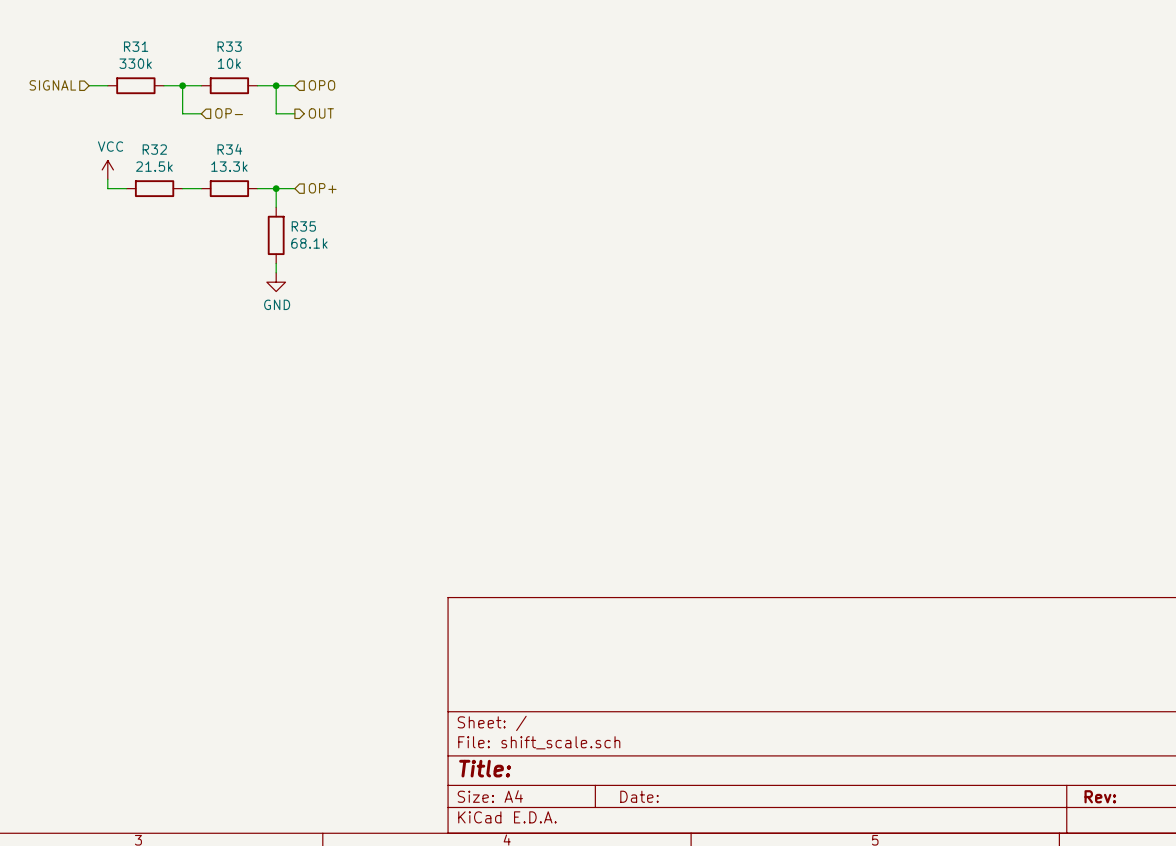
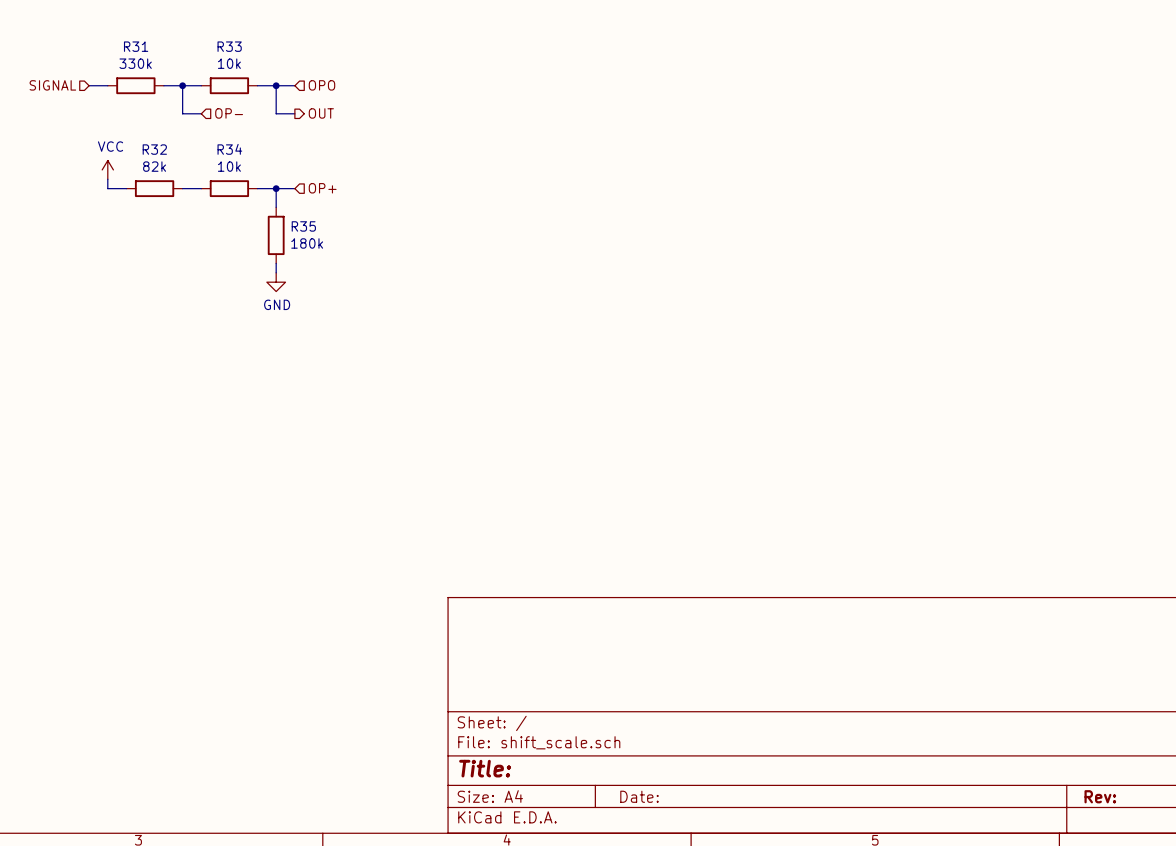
R32 value: 21.5k (154, 166) -> 82k (154, 166)
R34 value: 13.3k (229, 166) -> 10k (229, 166)
R35 value: 68.1k (309, 243) -> 180k (307, 243)

